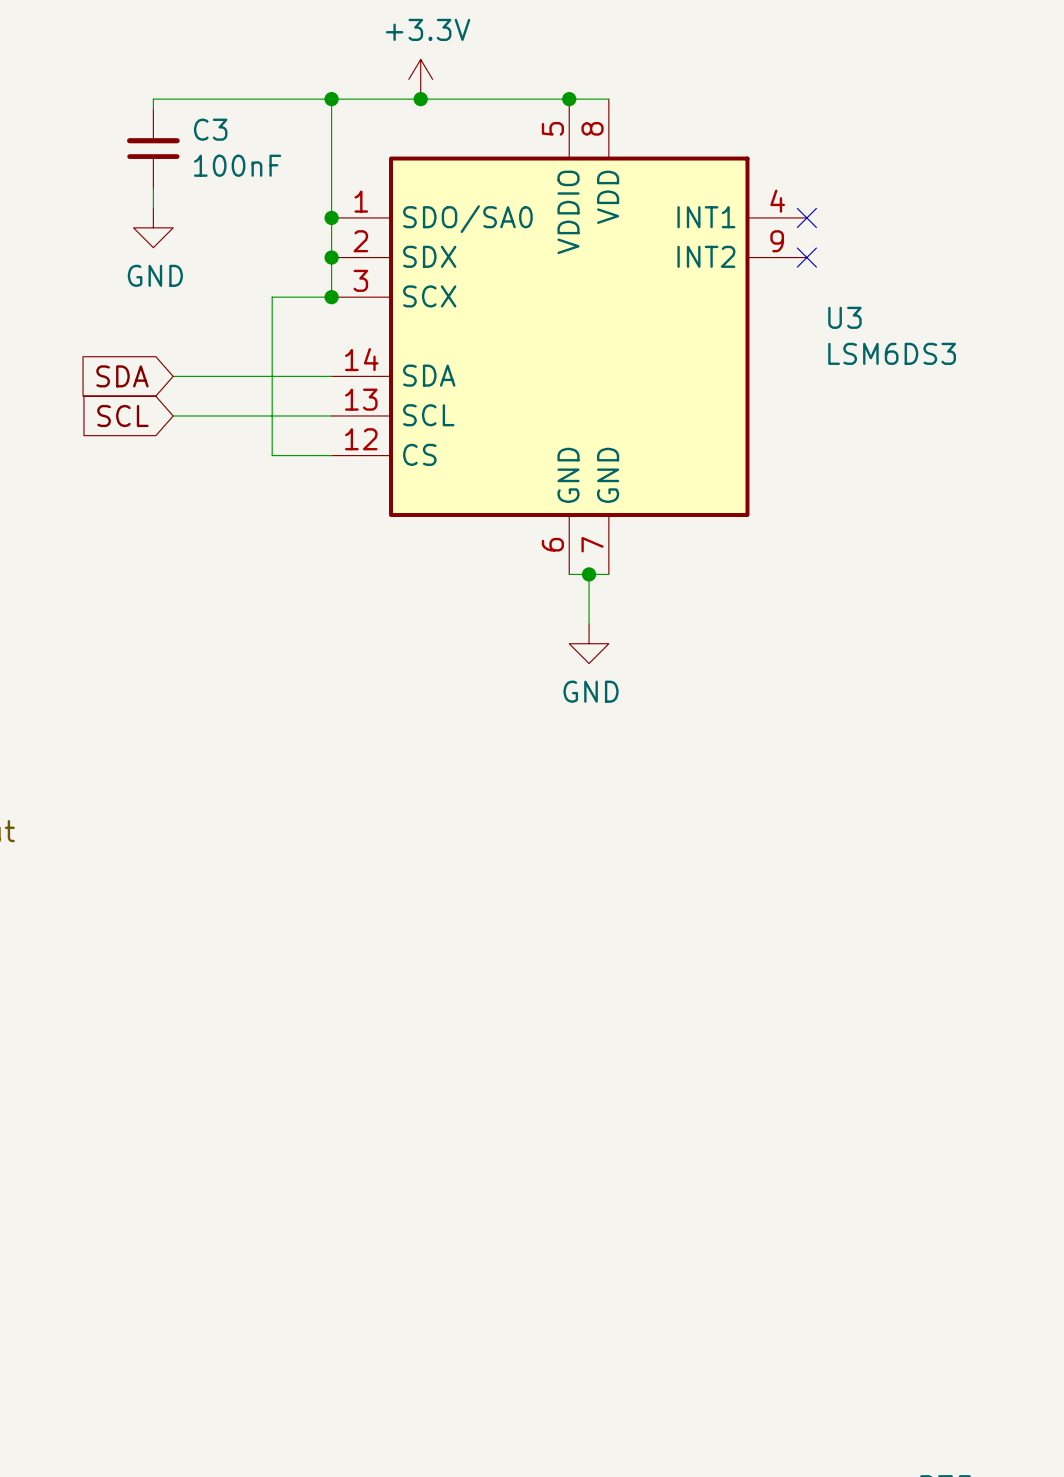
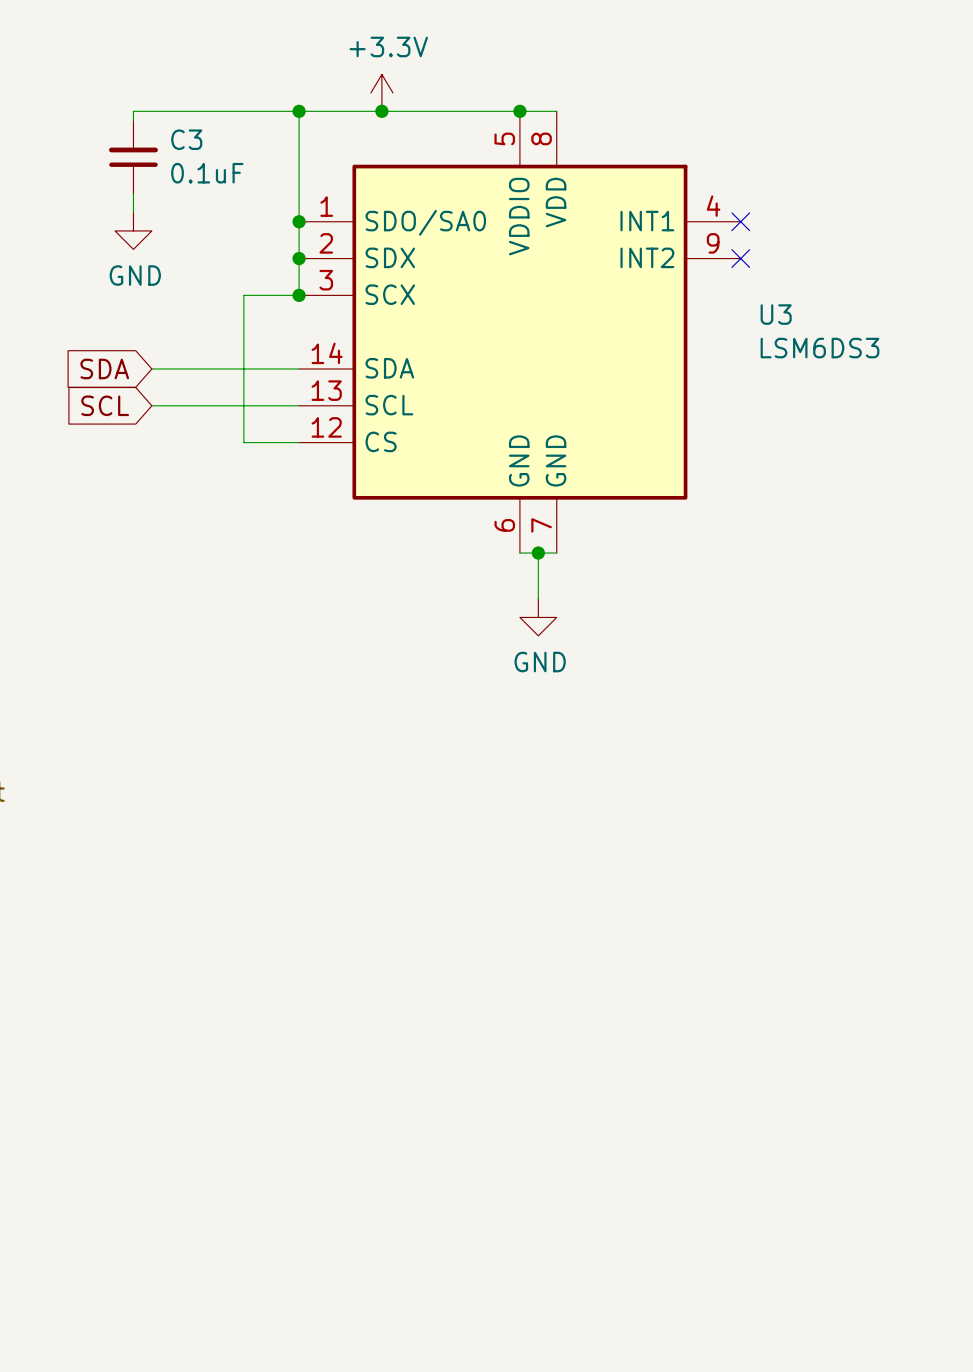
C3 value: 100nF (237, 165) -> 0.1uF (207, 173)

